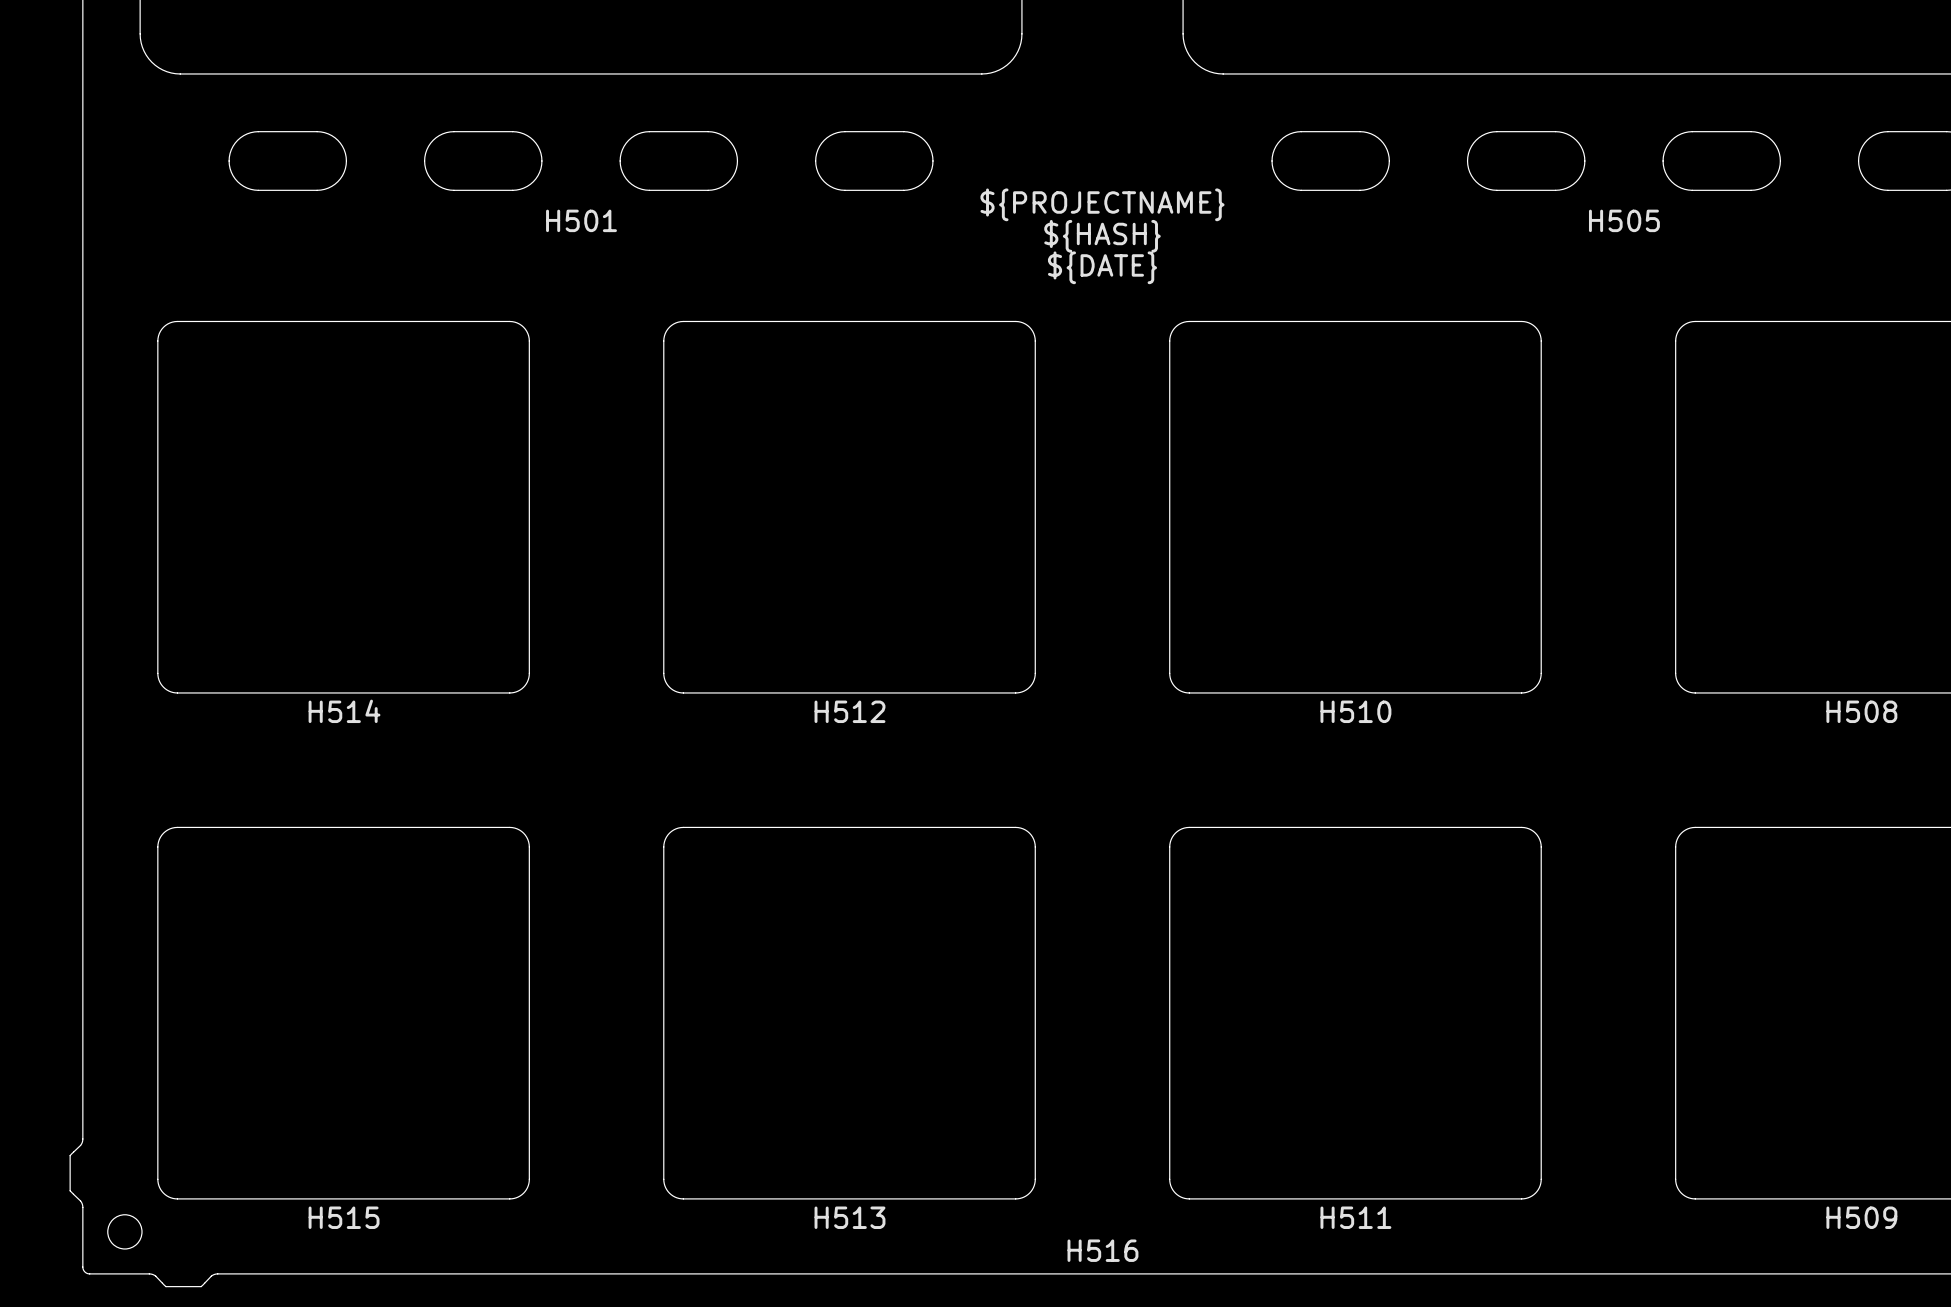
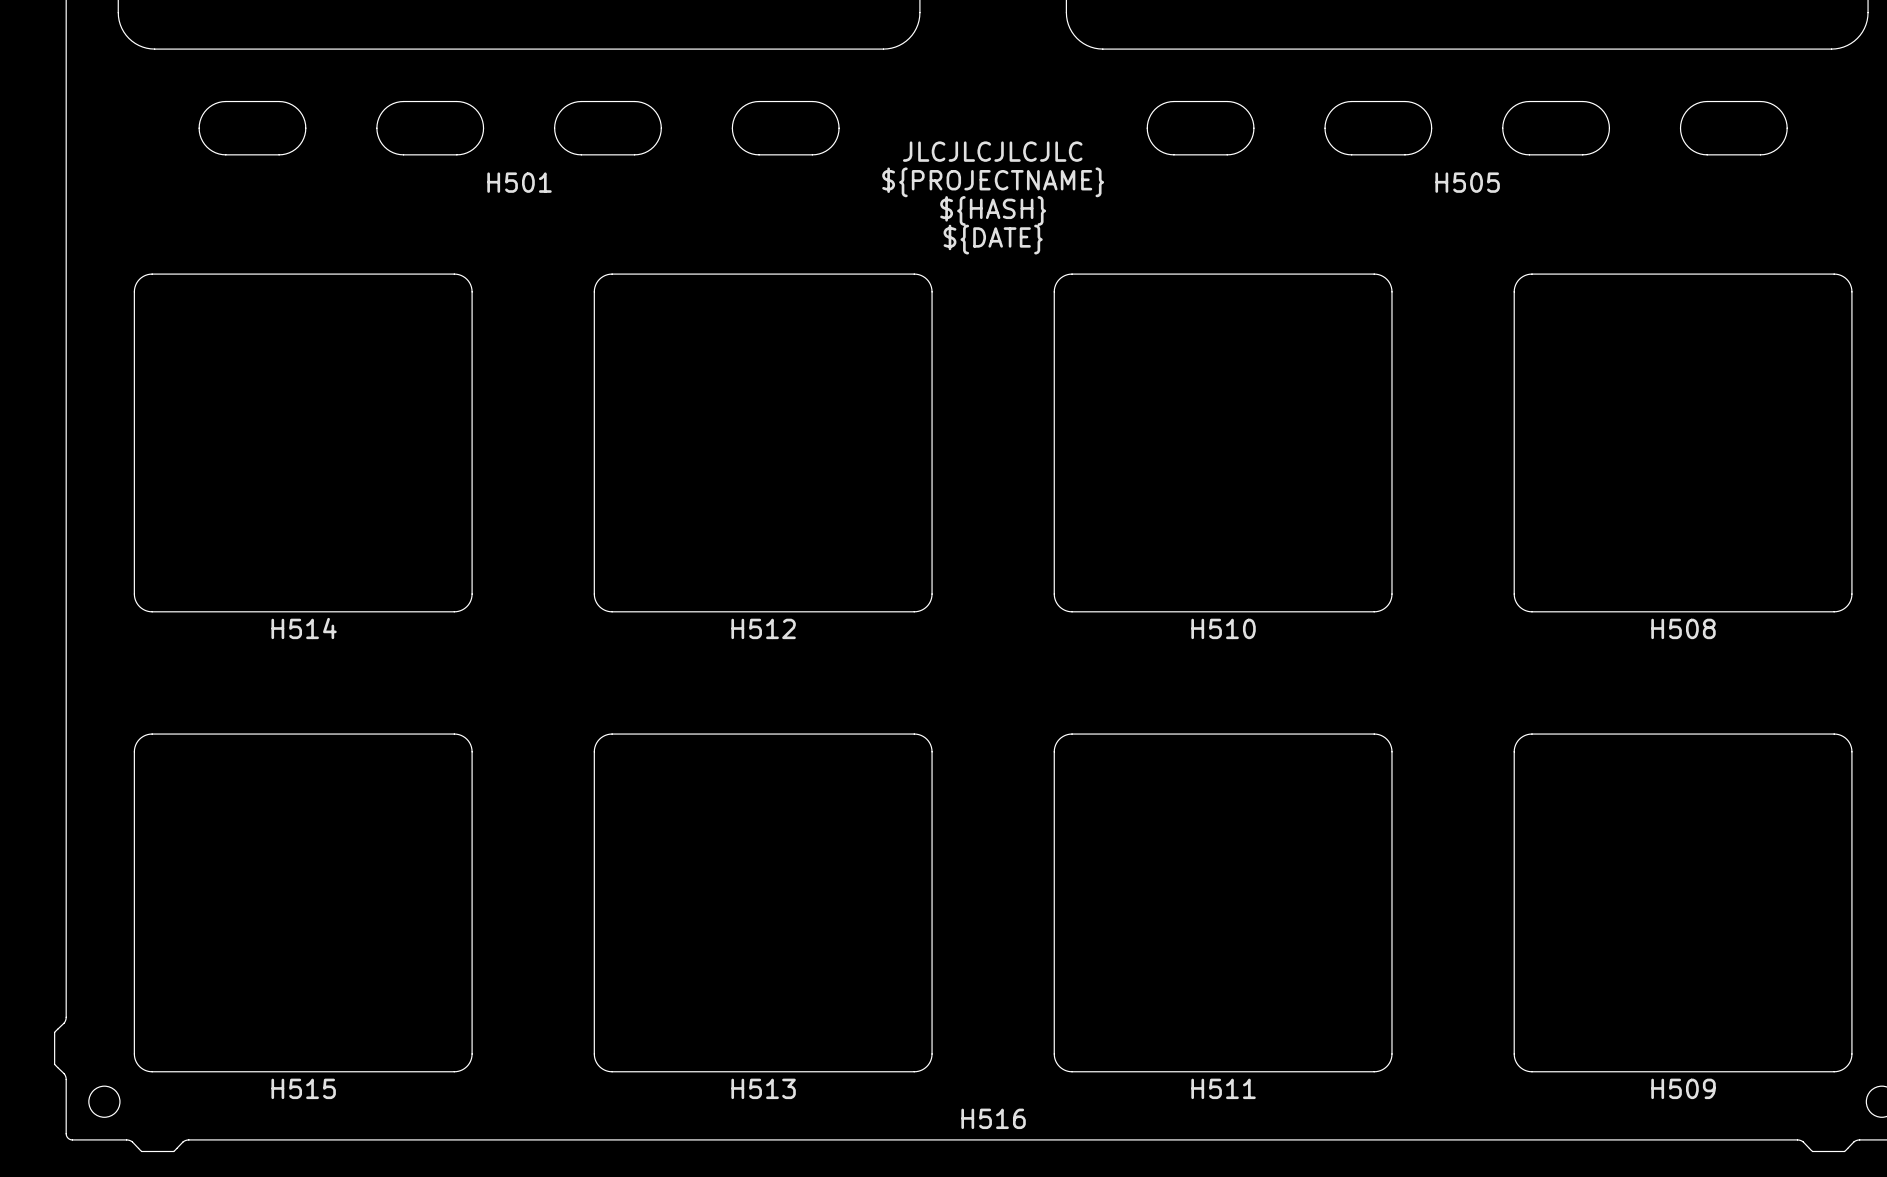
text: none -> JLCJLCJLCJLC (992, 151)
text position: ${PROJECTNAME} (1102, 204) -> ${PROJECTNAME} (993, 182)
text position: ${HASH} (1102, 236) -> ${HASH} (993, 210)
text position: ${DATE} (1102, 267) -> ${DATE} (993, 239)

